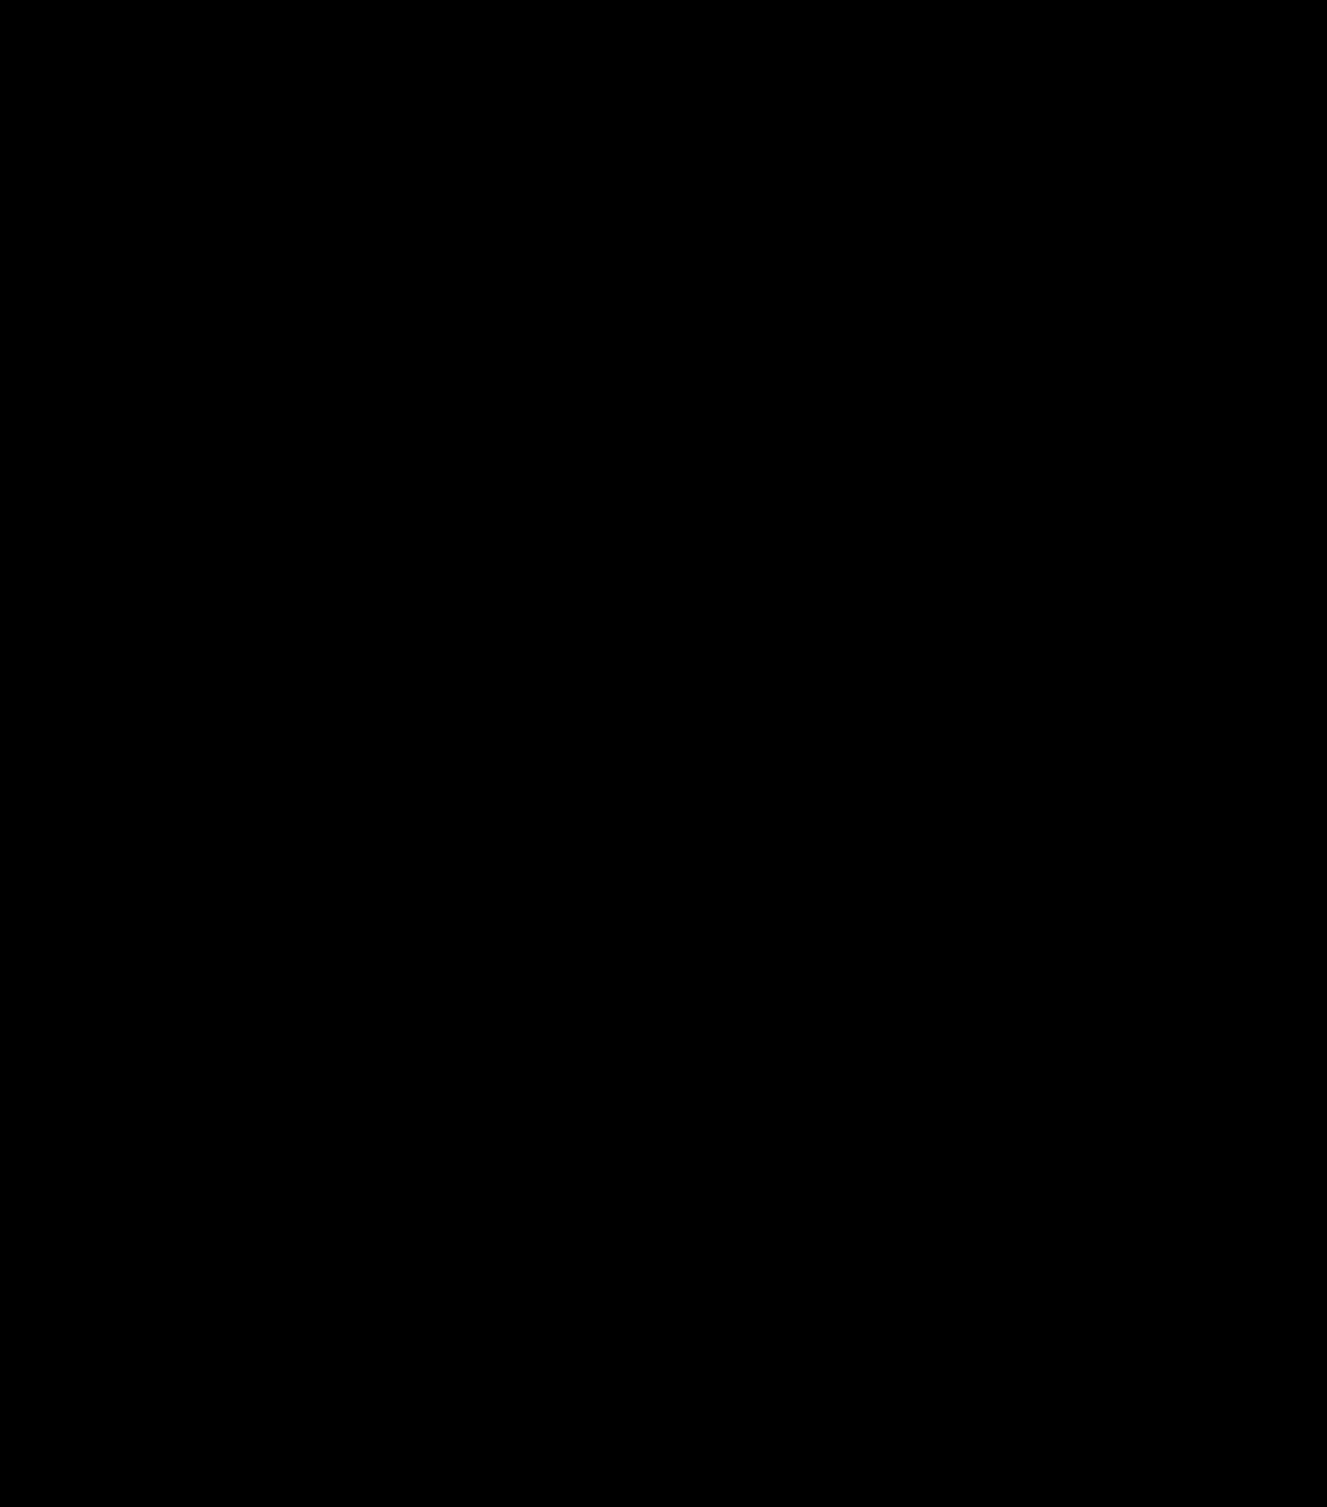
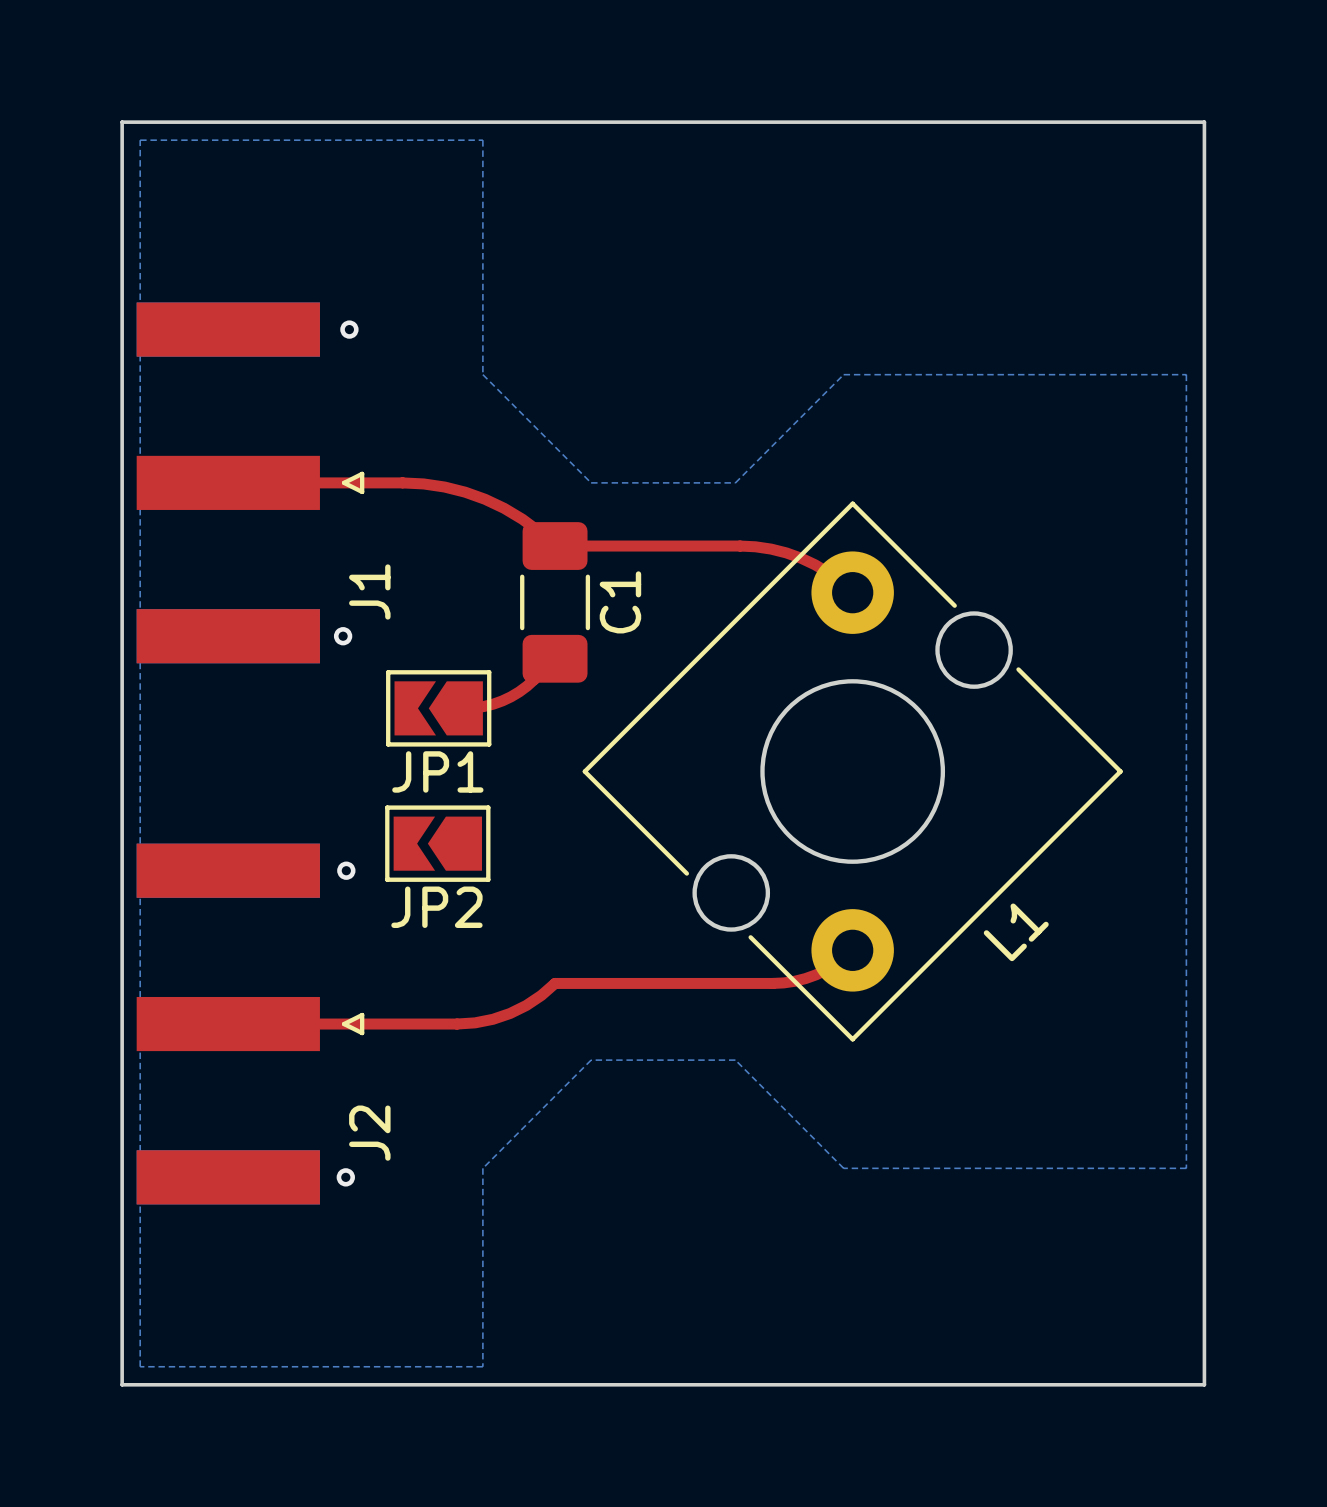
board edge: none -> (122, 122) (1204, 122) (1204, 1384) (122, 1384) (122, 122)
bottom zone outline: none -> (140, 140) (140, 1366) (482, 1366) (482, 1168) (591, 1060) (735, 1060) (843, 1168) (1186, 1168) (1186, 374) (843, 374) (735, 482) (591, 482) (482, 374) (482, 140) (140, 140)
via: none -> (349, 329)
top track: none -> (228, 482) (402, 482) (444, 487) (485, 499) (504, 508) (522, 519) (555, 546) (740, 546) (771, 549) (786, 552) (815, 564) (828, 572) (852, 592)
J1: none -> (250, 482)
C1: none -> (555, 602)
via: none -> (343, 636)
top track: none -> (555, 658) (527, 686) (511, 696) (493, 704) (464, 708)
JP1: none -> (438, 708)
L1: none -> (852, 771)
JP2: none -> (437, 843)
via: none -> (346, 870)
top track: none -> (852, 950) (826, 970) (805, 978) (783, 982) (555, 983) (526, 1005) (510, 1013) (475, 1022) (228, 1024)
J2: none -> (250, 1024)
via: none -> (345, 1177)

